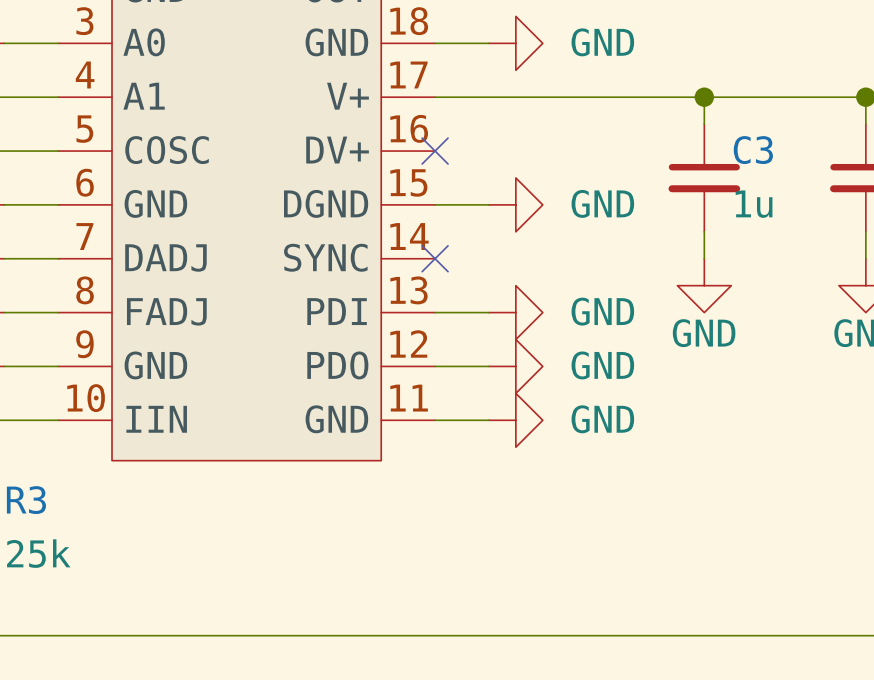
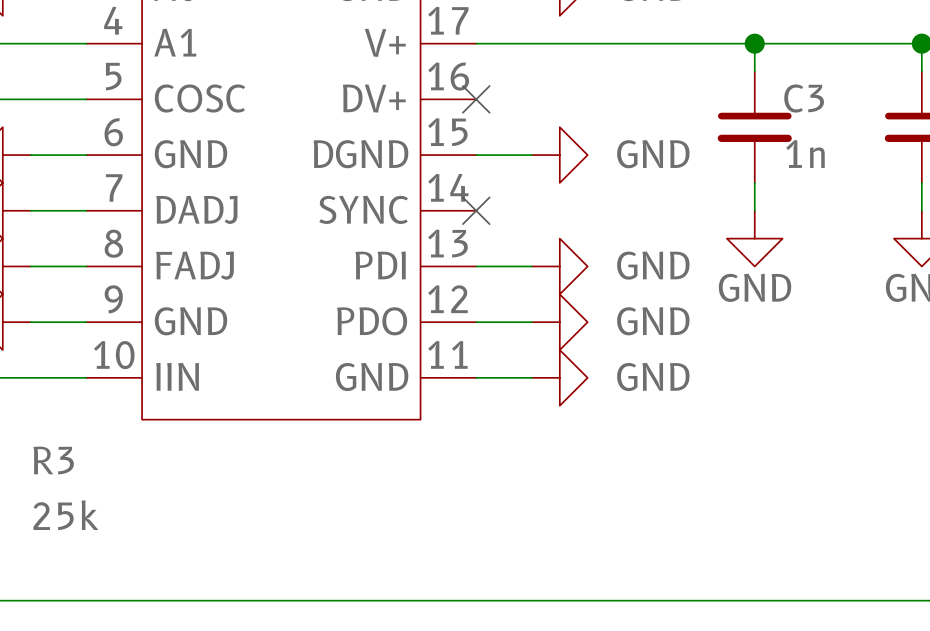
C3 value: 1u (754, 204) -> 1n (805, 154)

